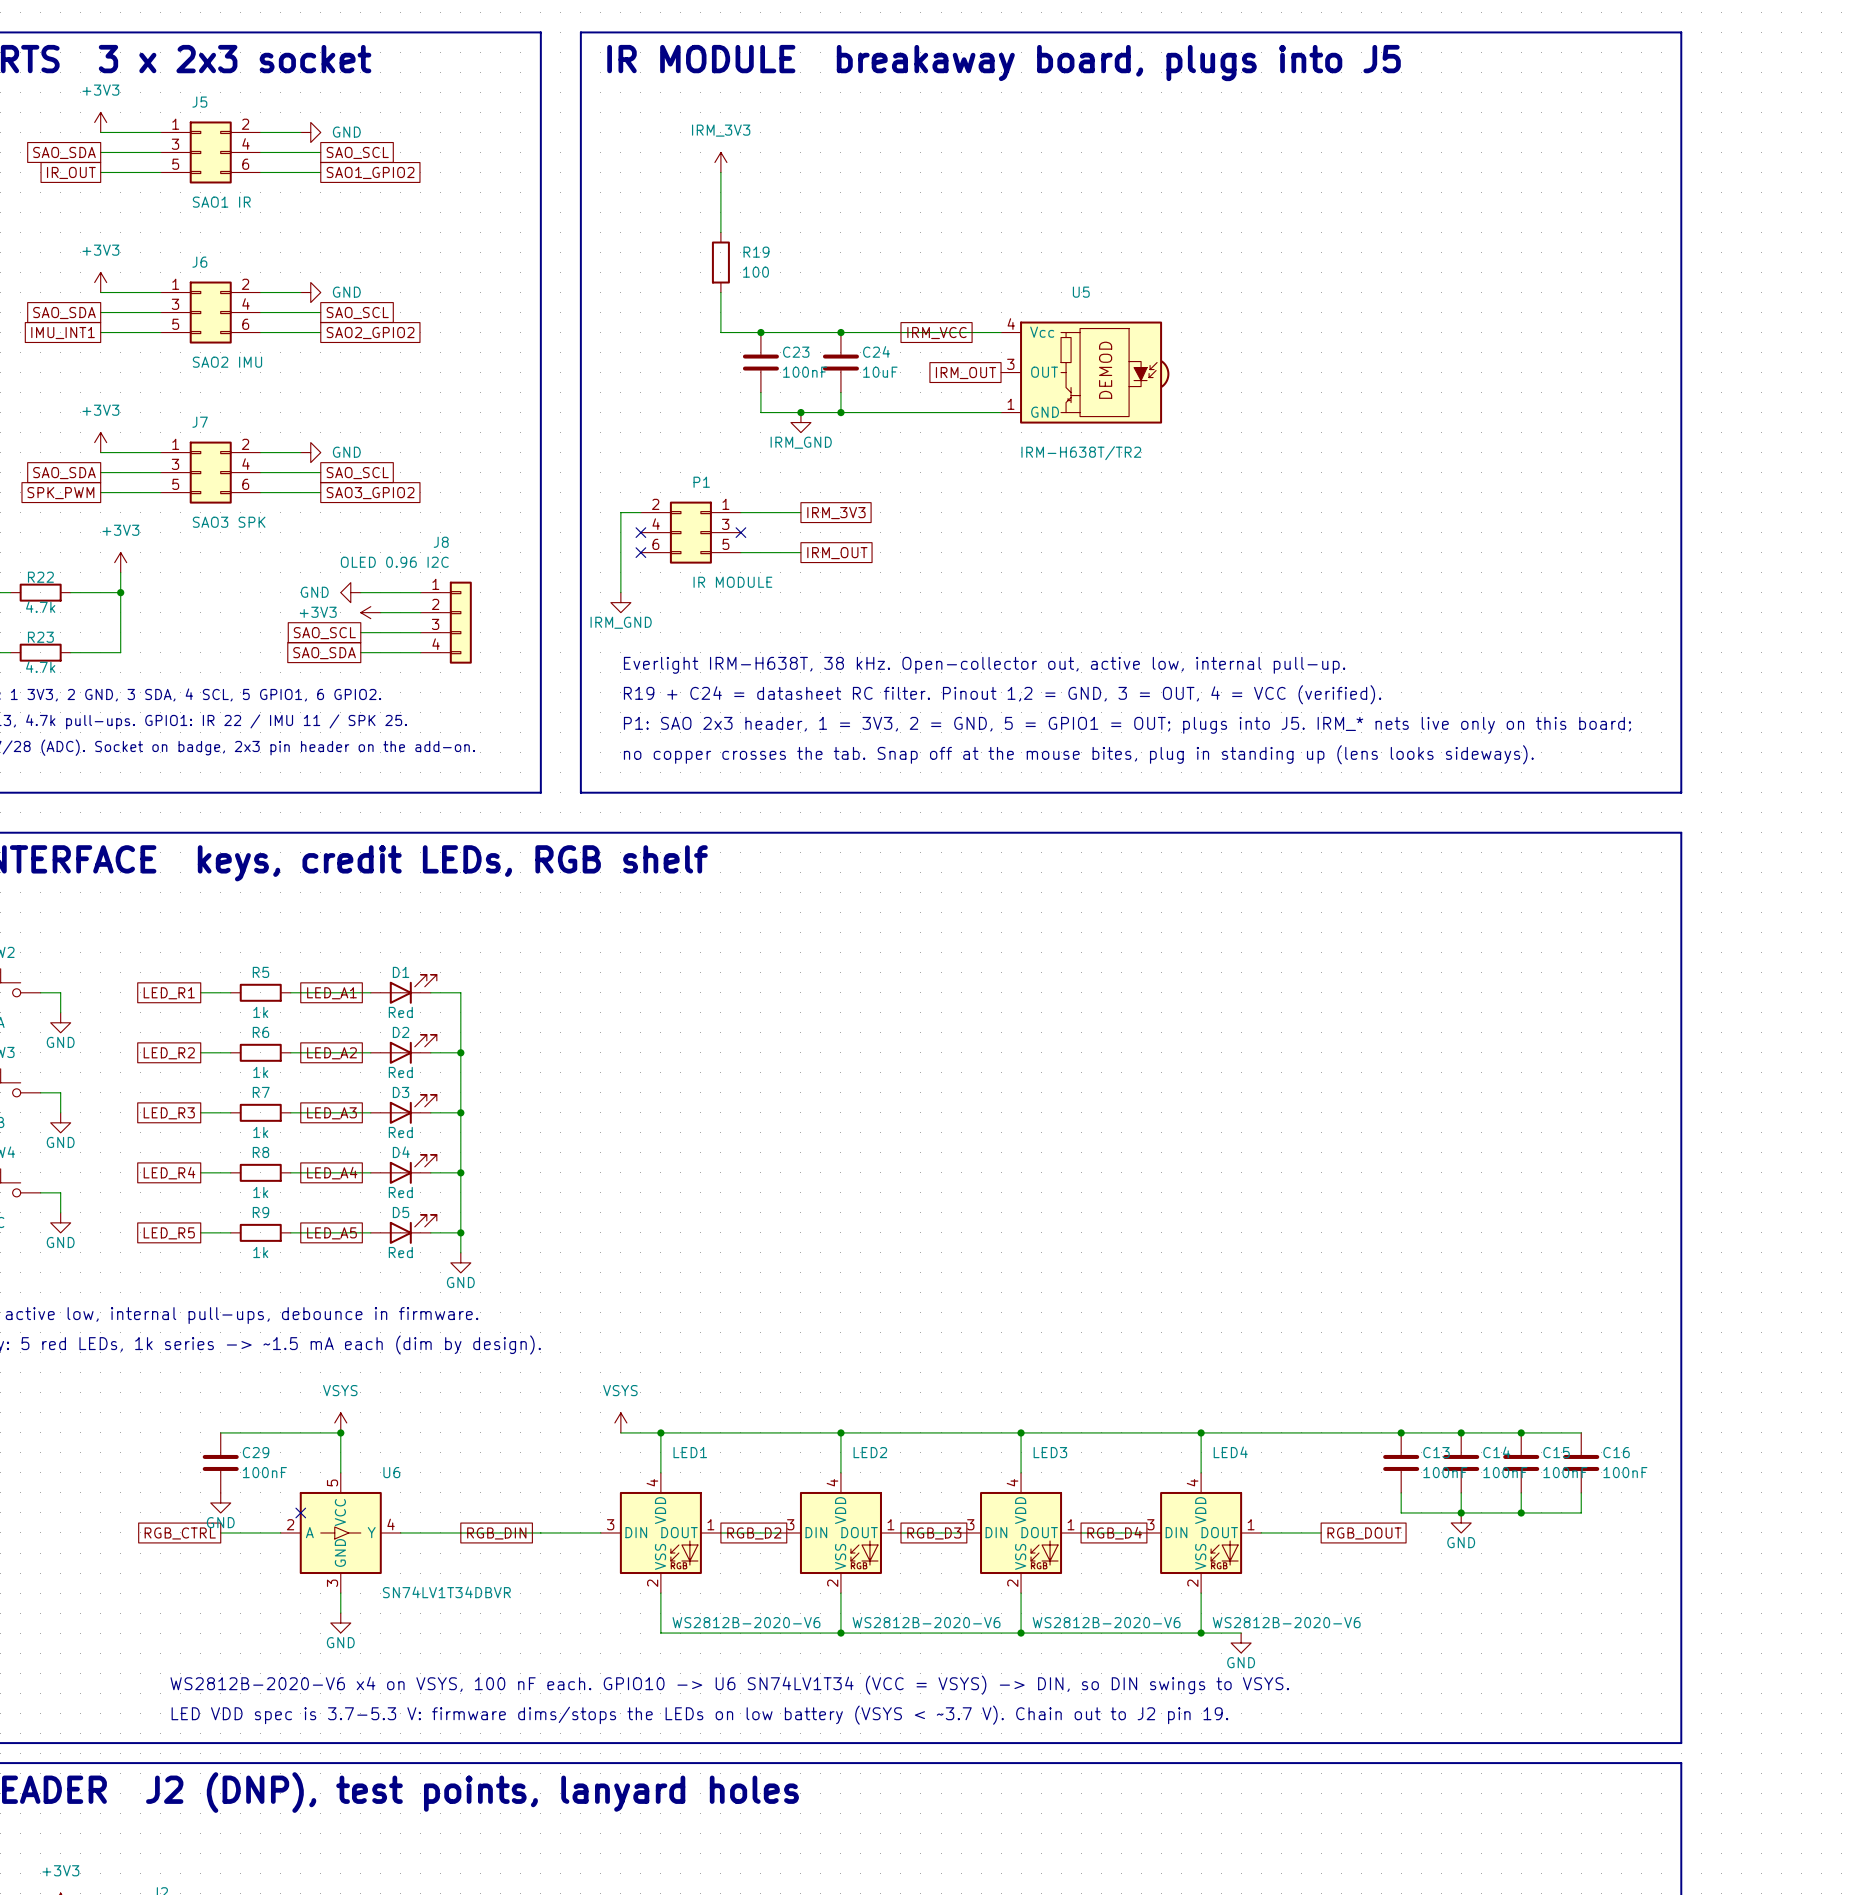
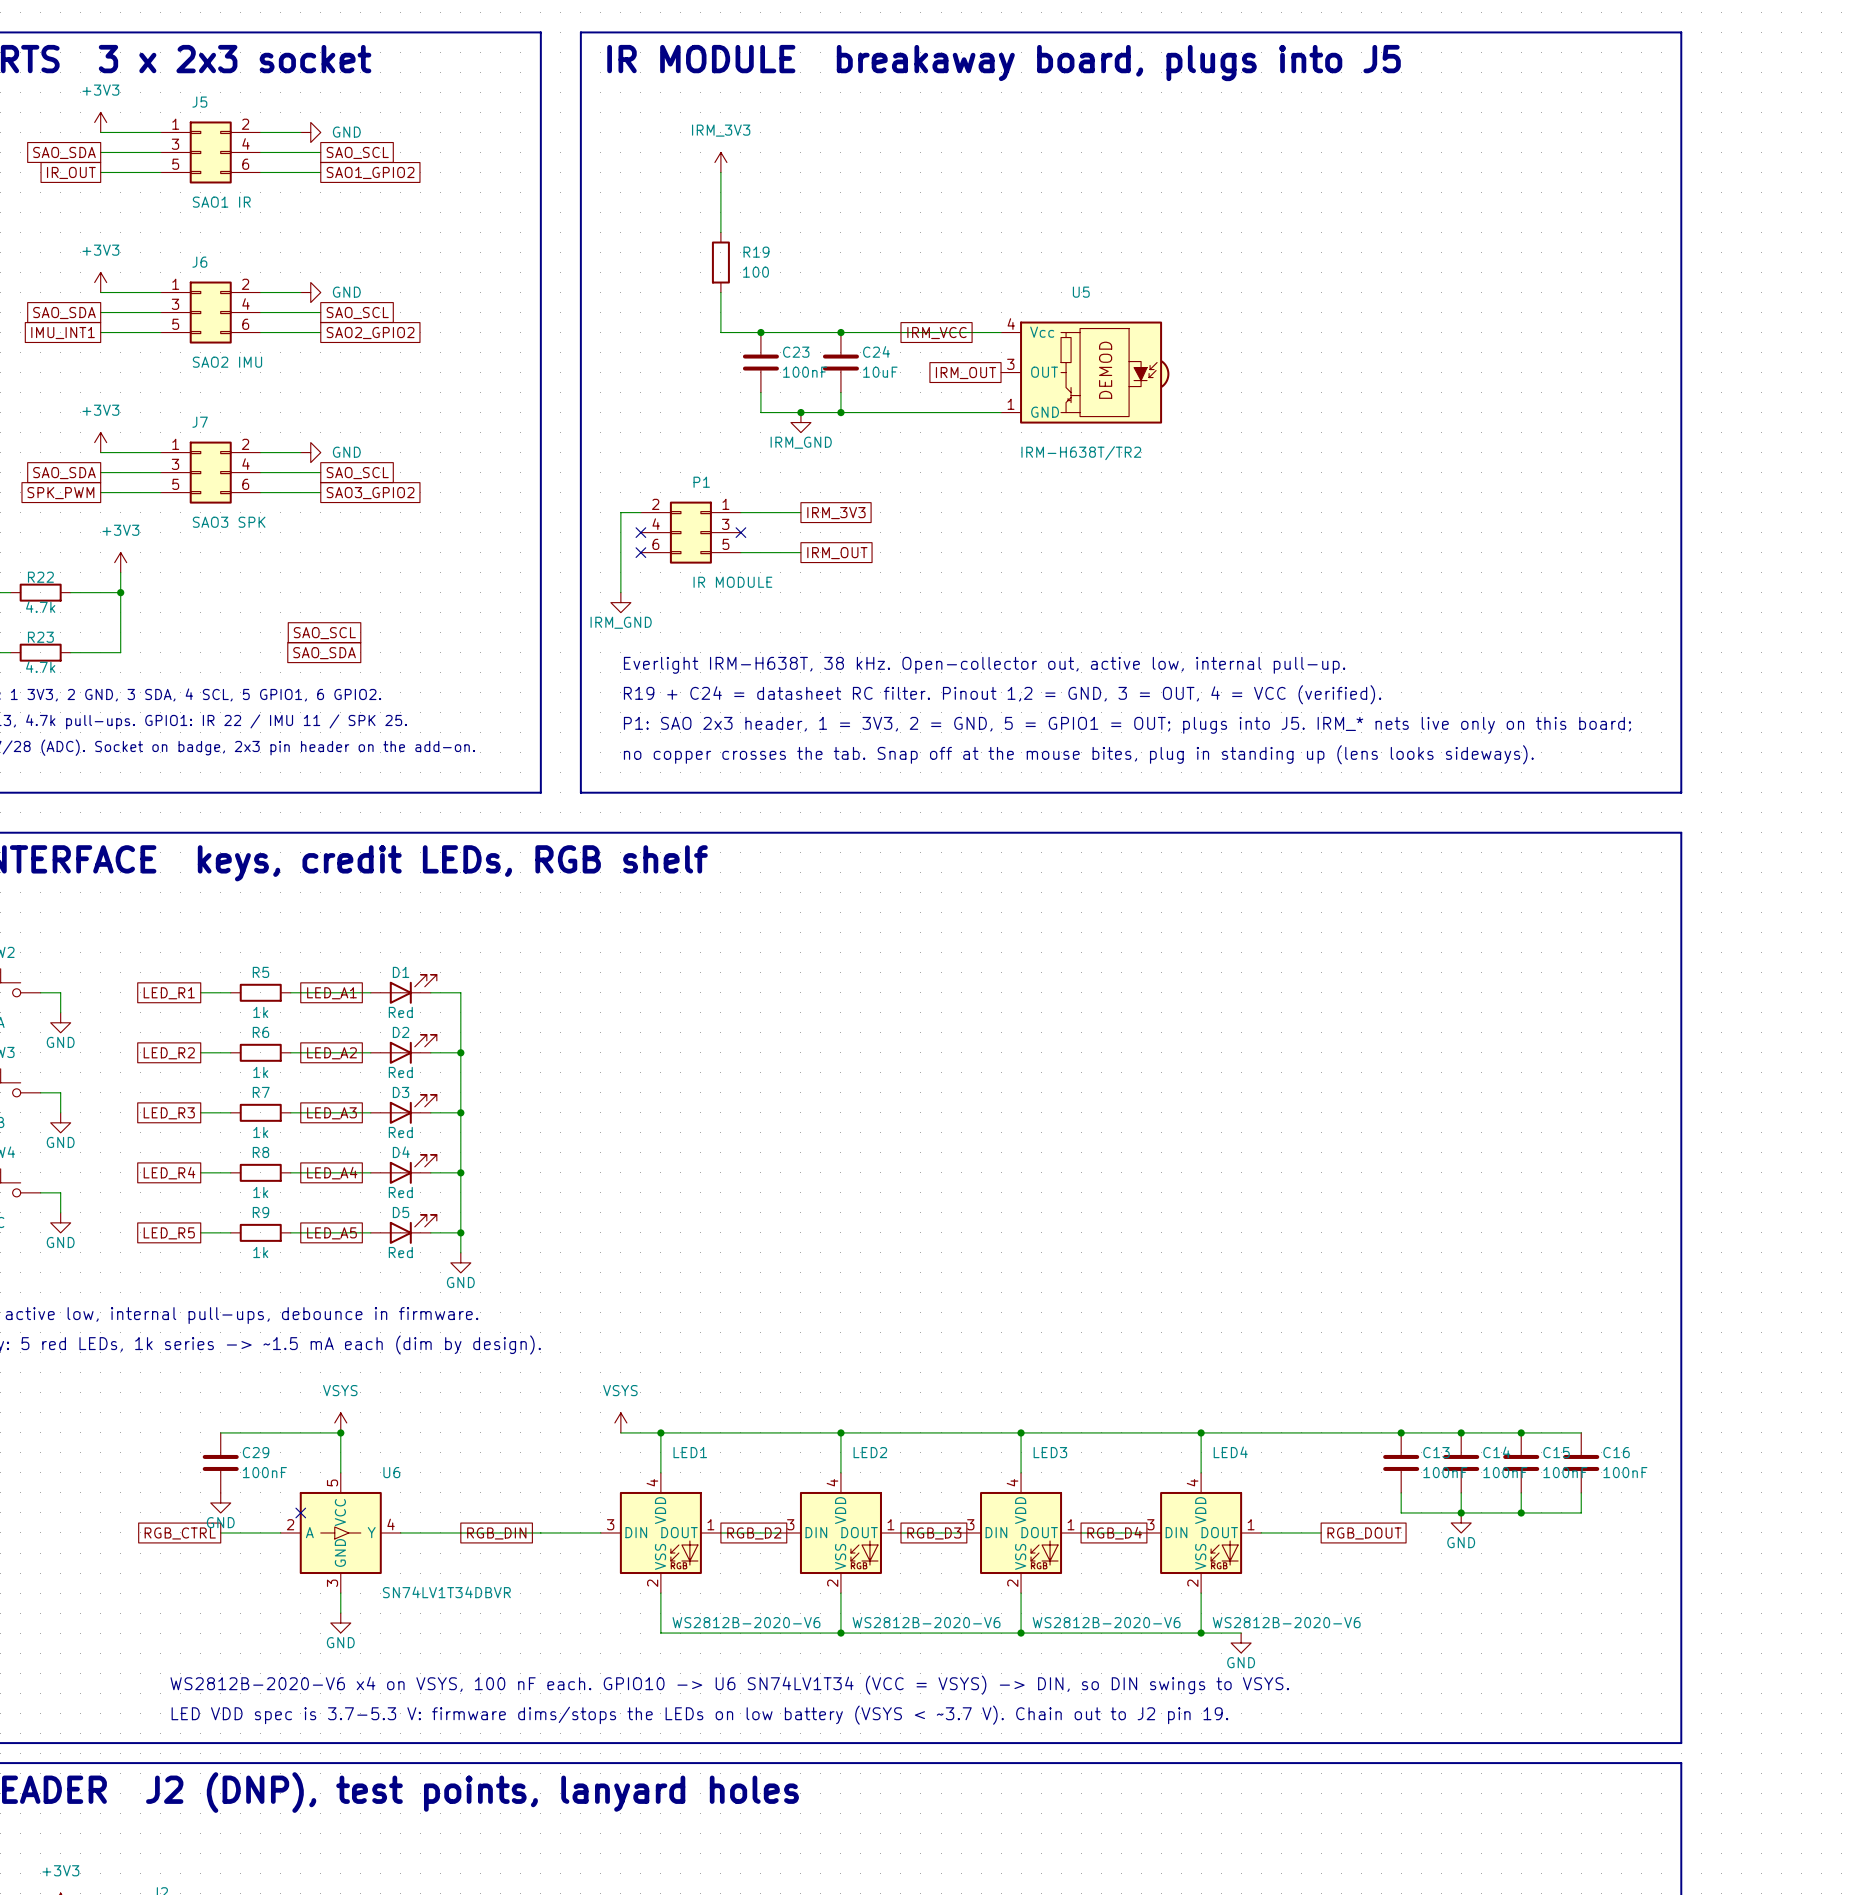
power symbol: GND (350, 592) -> none
wire: (360, 592) (420, 592) -> none
power symbol: +3V3 (370, 612) -> none
wire: (380, 612) (420, 612) -> none
J8: OLED 0.96 I2C (446, 622) -> none
wire: (360, 632) (420, 632) -> none
wire: (360, 652) (420, 652) -> none

